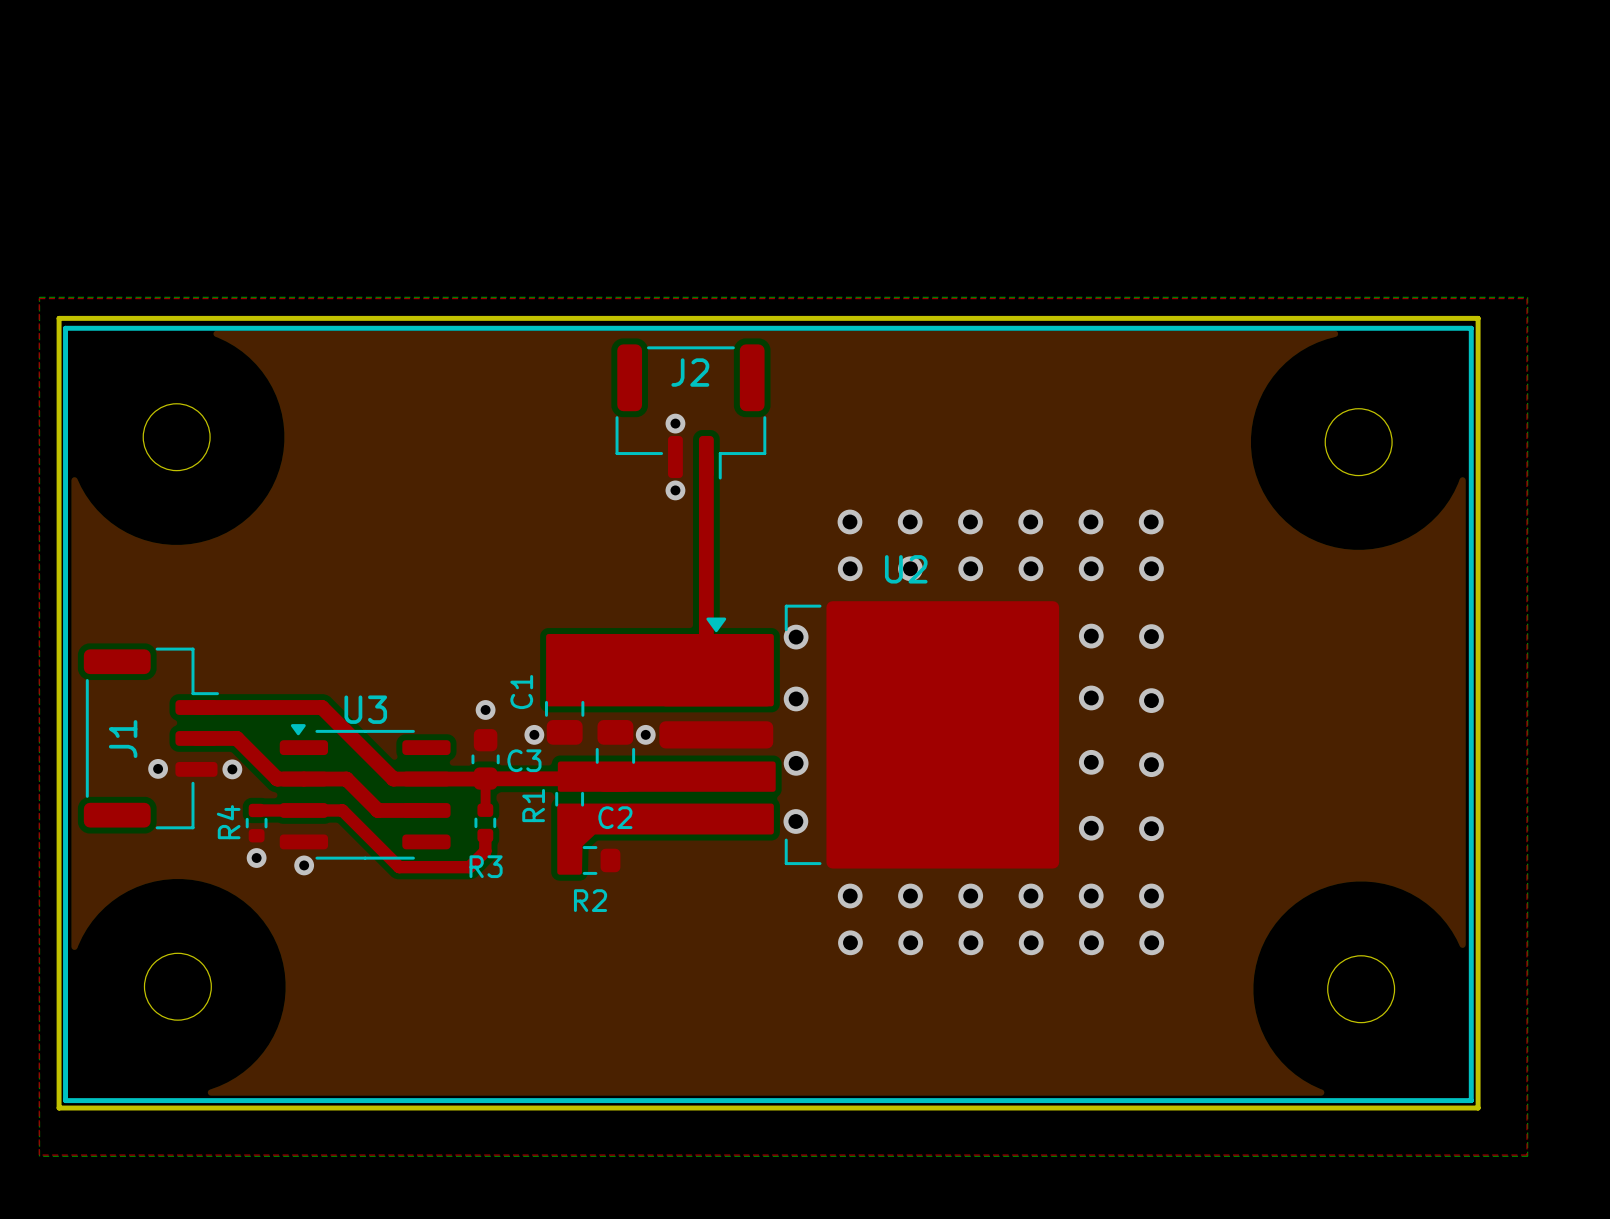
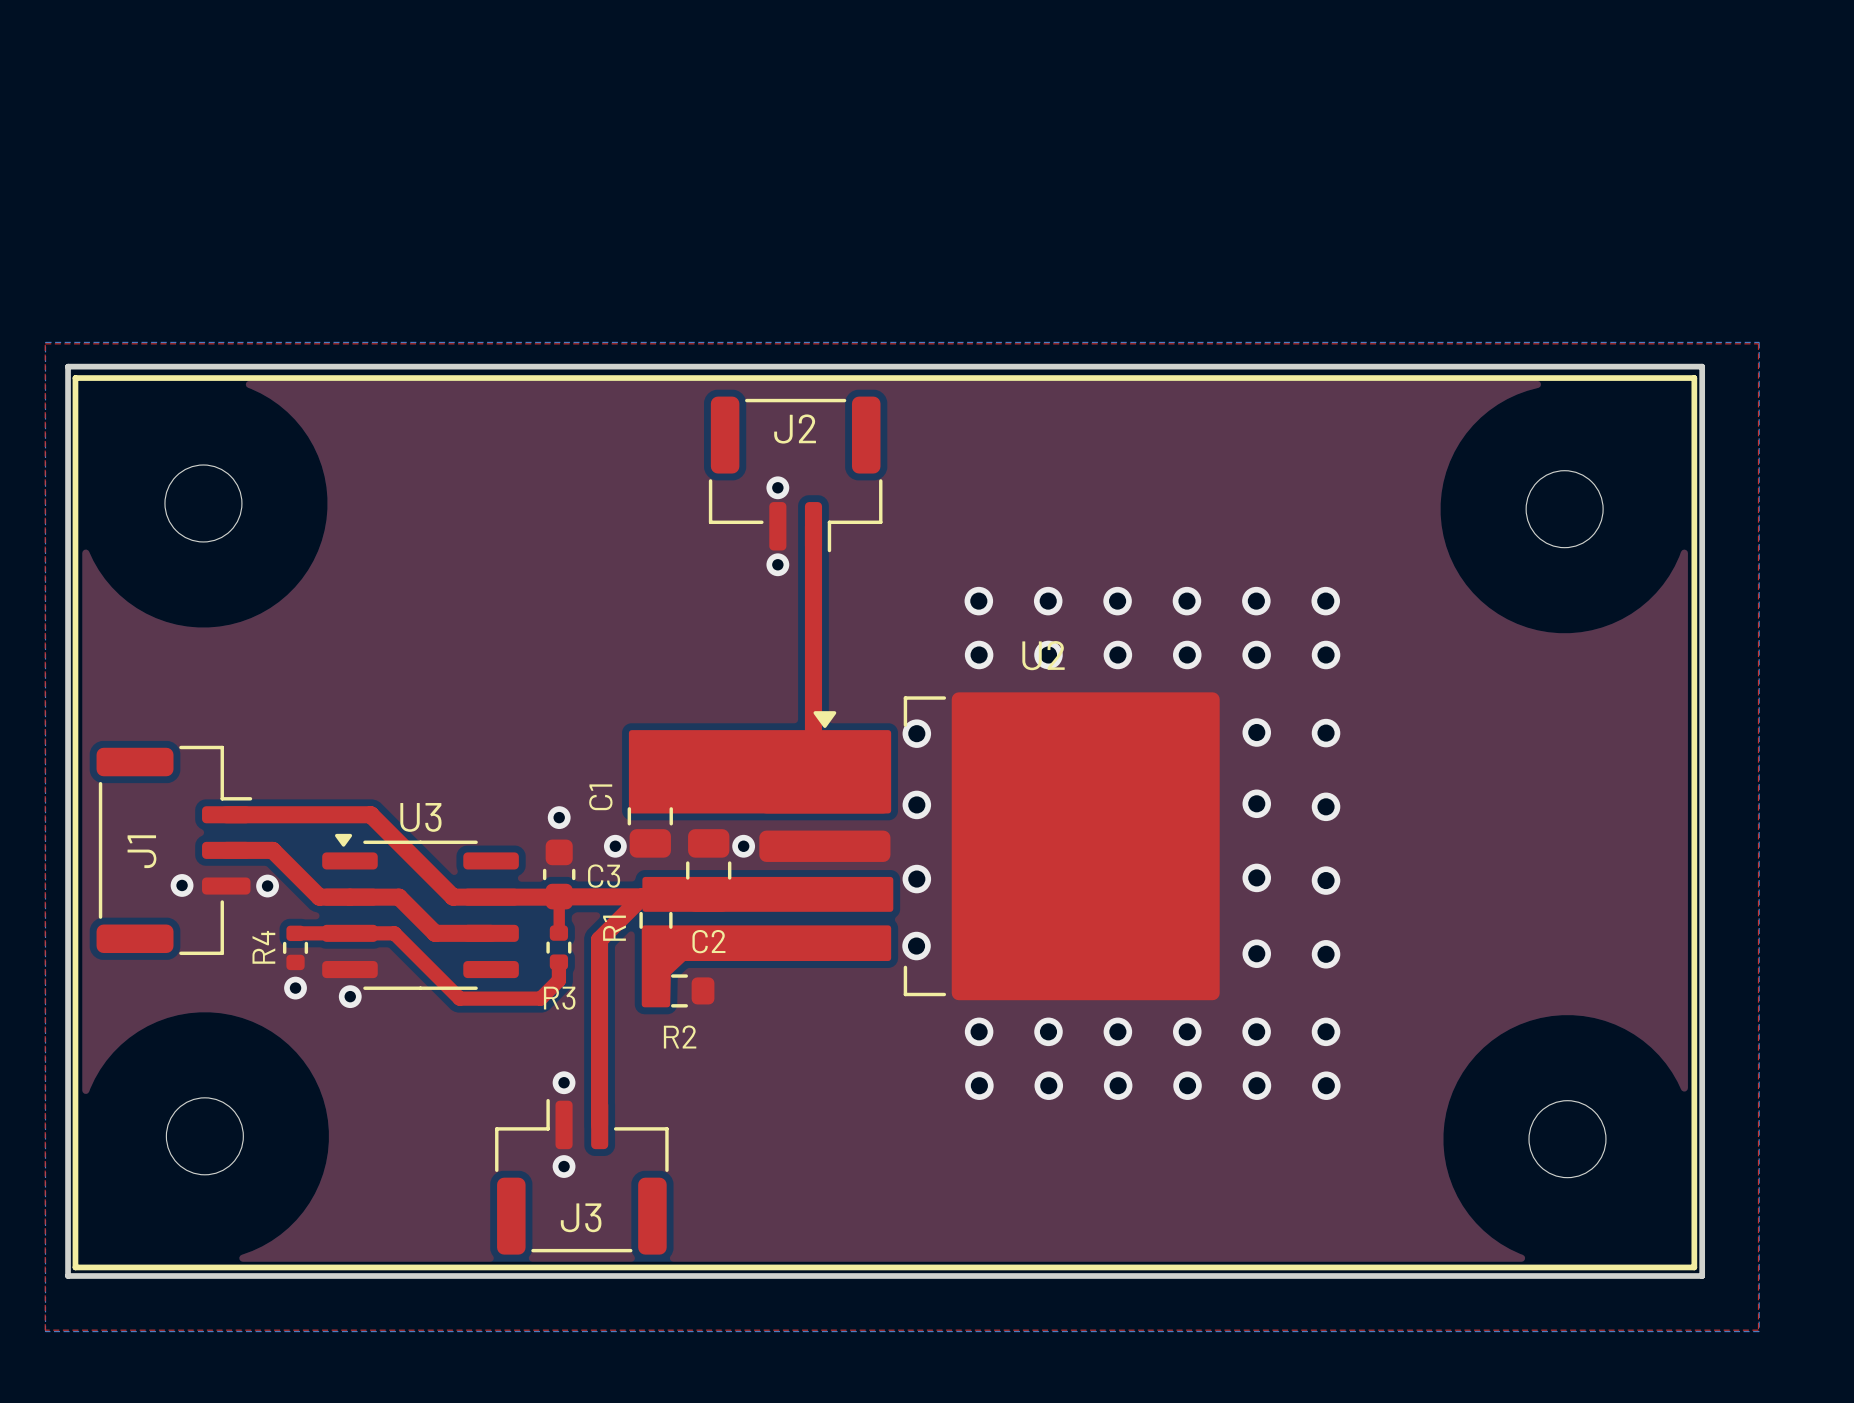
top track: none -> (642, 896) (599, 939) (599, 1125)
via: none -> (564, 1082)
via: none -> (564, 1166)
J3: none -> (581, 1176)

